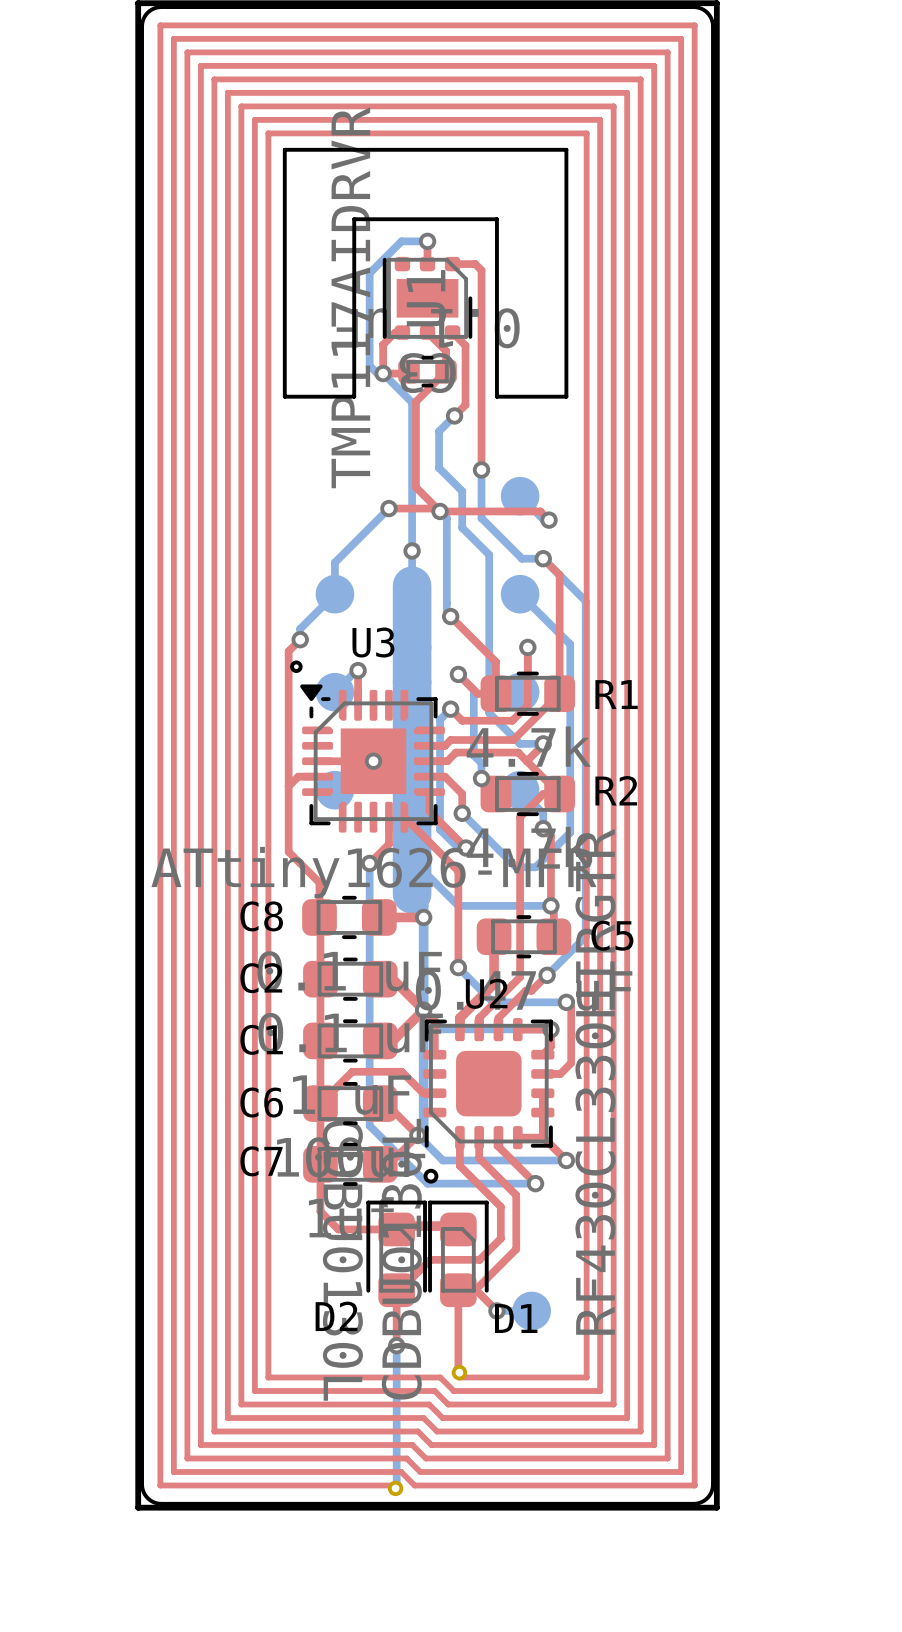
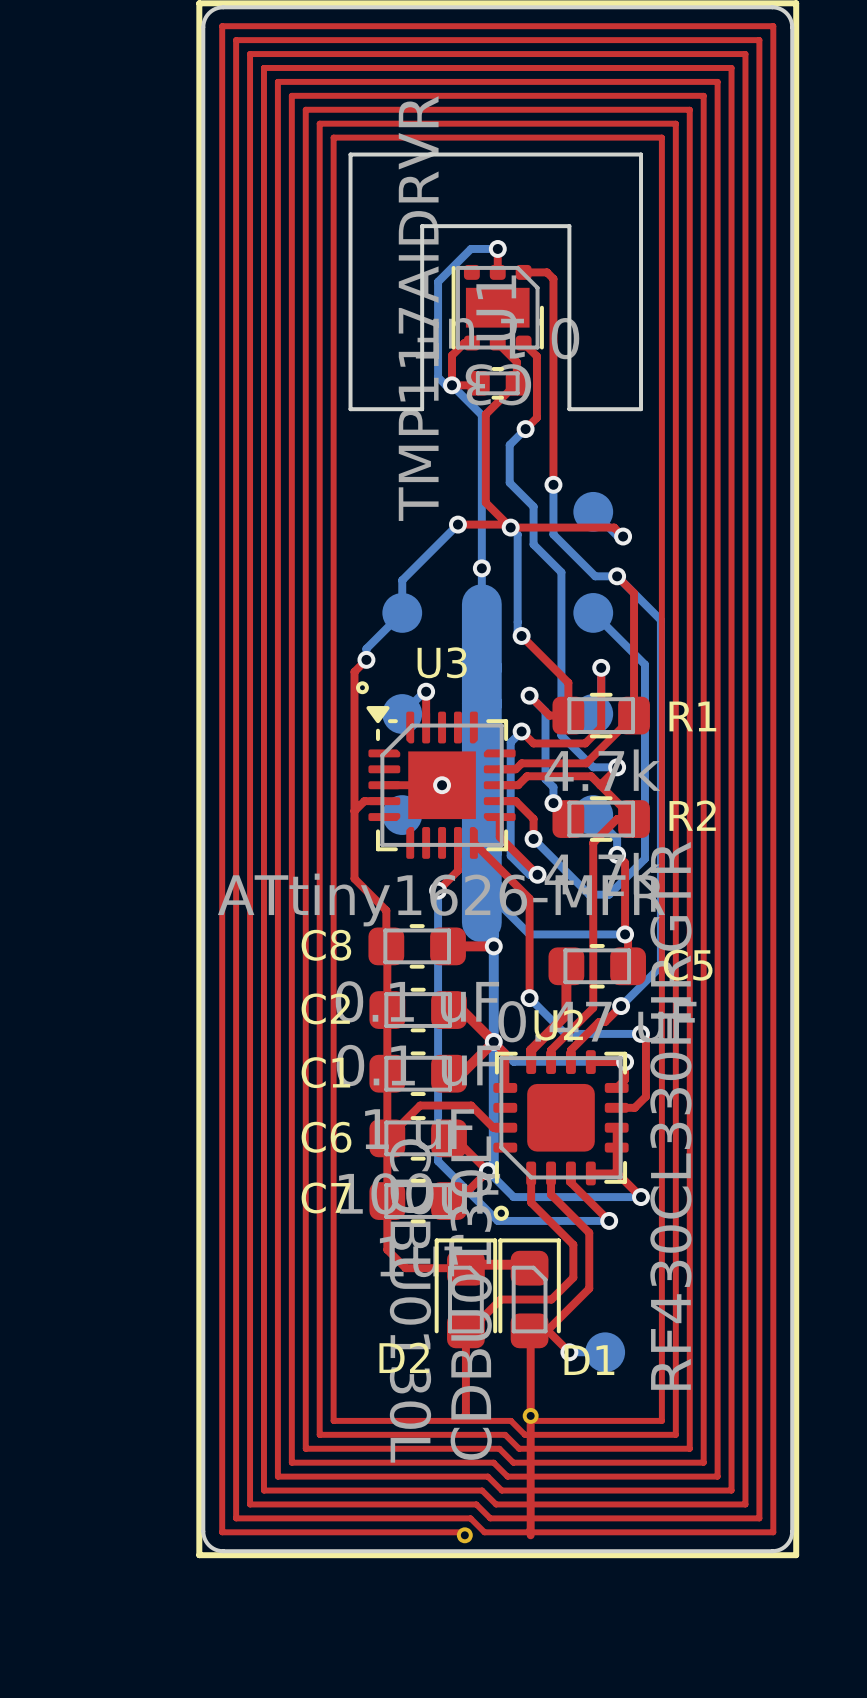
top track: (458, 1290) (459, 1372) -> (529, 1330) (530, 1535)
top track: none -> (465, 1388) (464, 1415)
bottom track: (396, 1345) (395, 1488) -> none
via: (396, 1345) -> none

